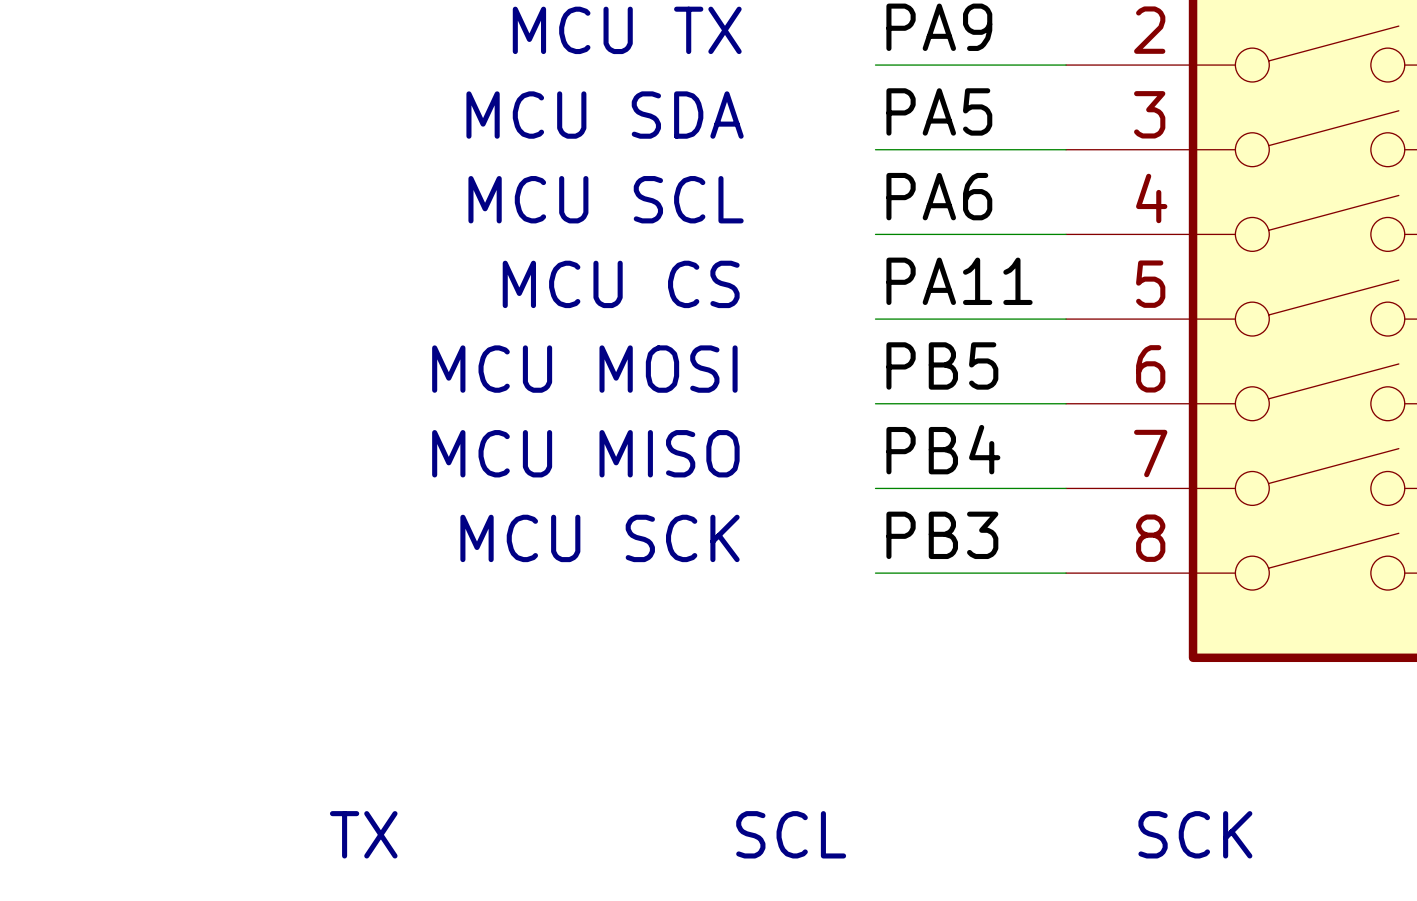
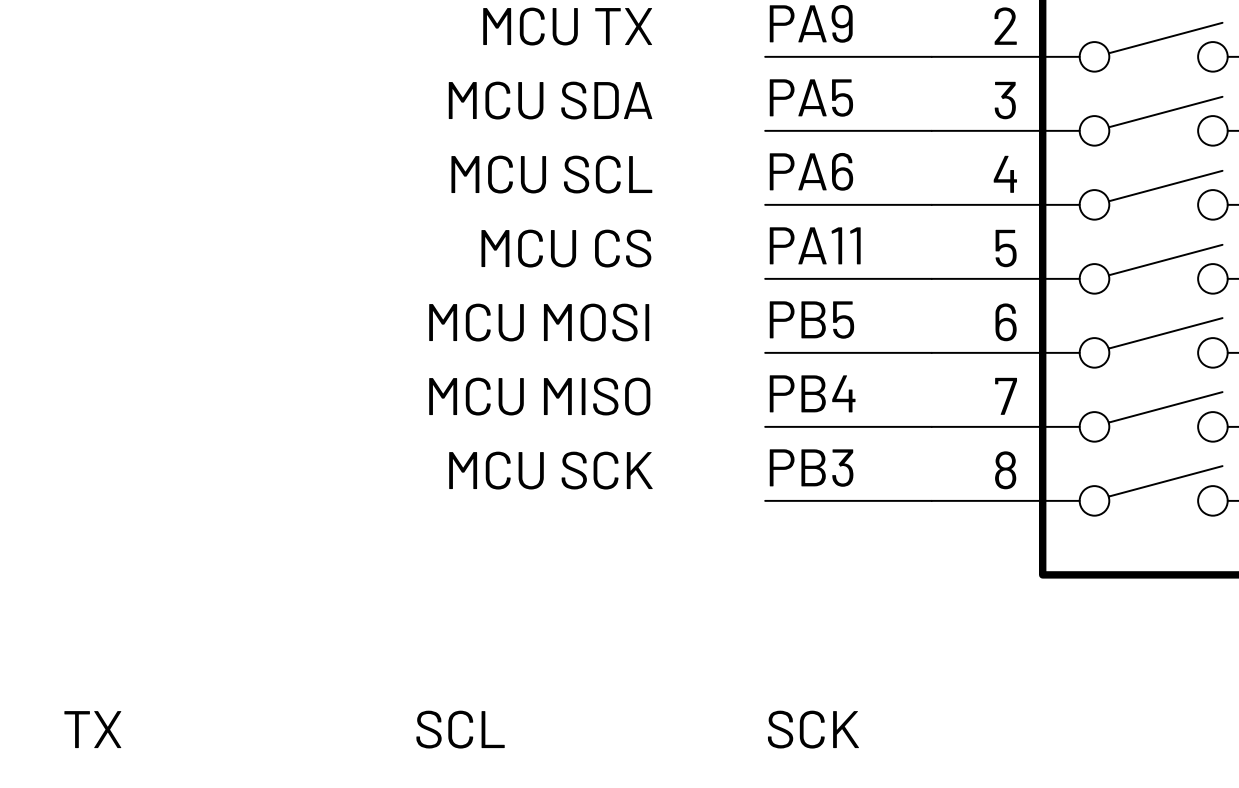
text position: TX (363, 834) -> TX (92, 729)
text position: SCL (791, 834) -> SCL (460, 729)
text position: SCK (1195, 834) -> SCK (813, 729)

